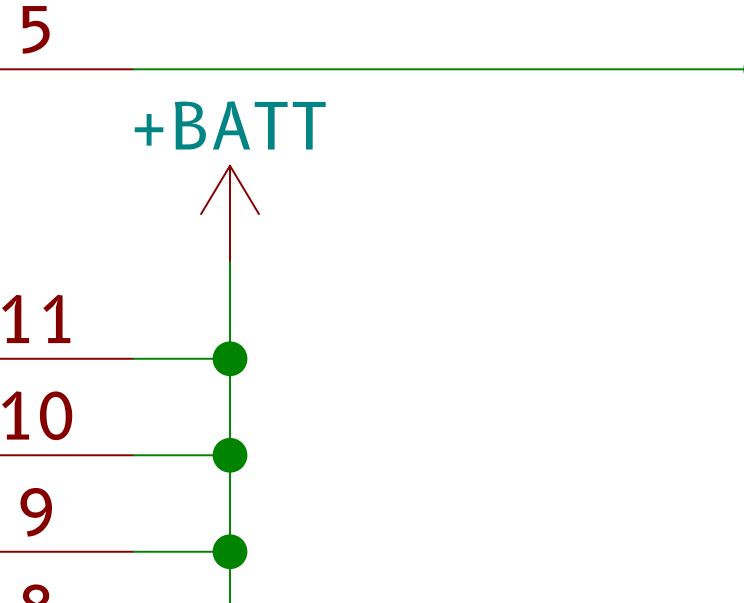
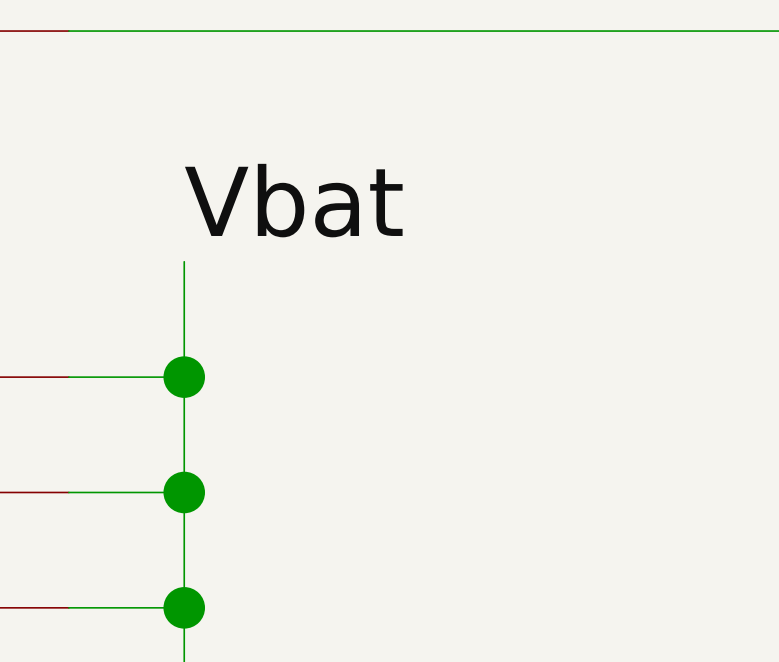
label: none -> Vbat (293, 200)
power symbol: +BATT (230, 214) -> none

